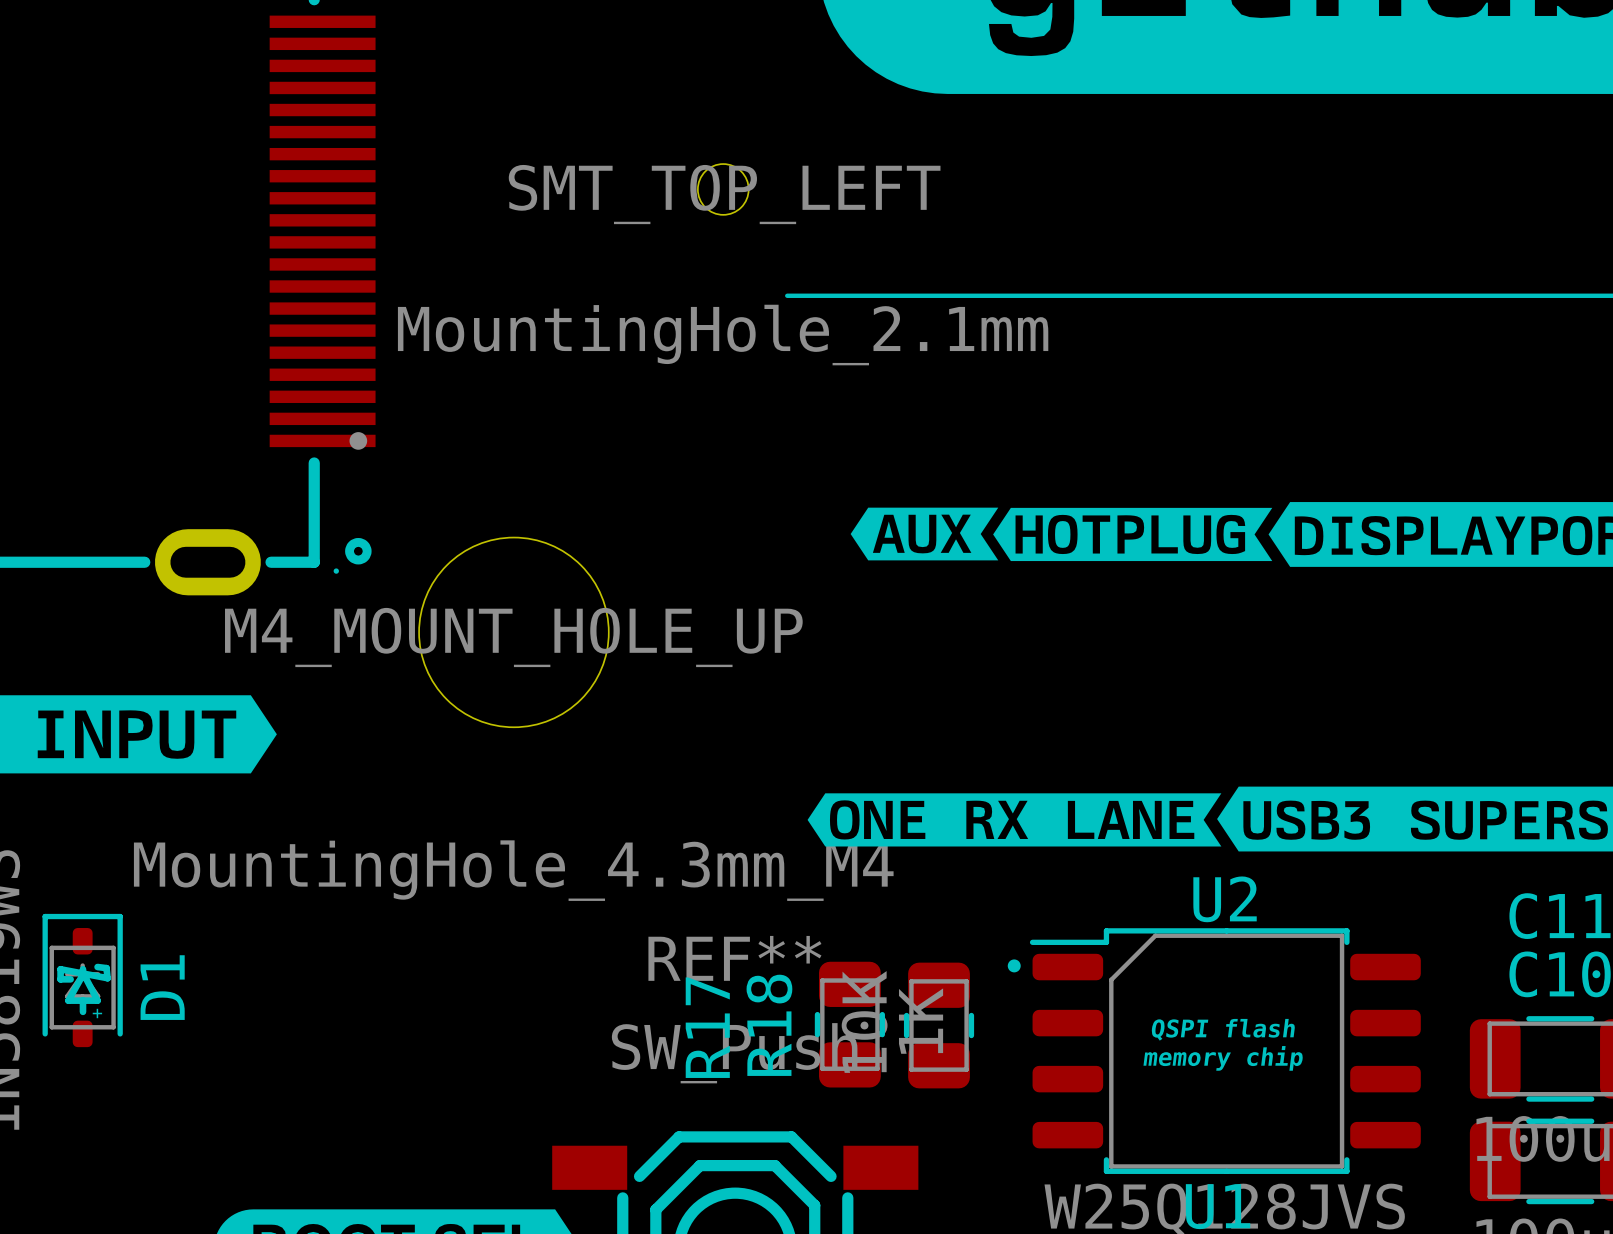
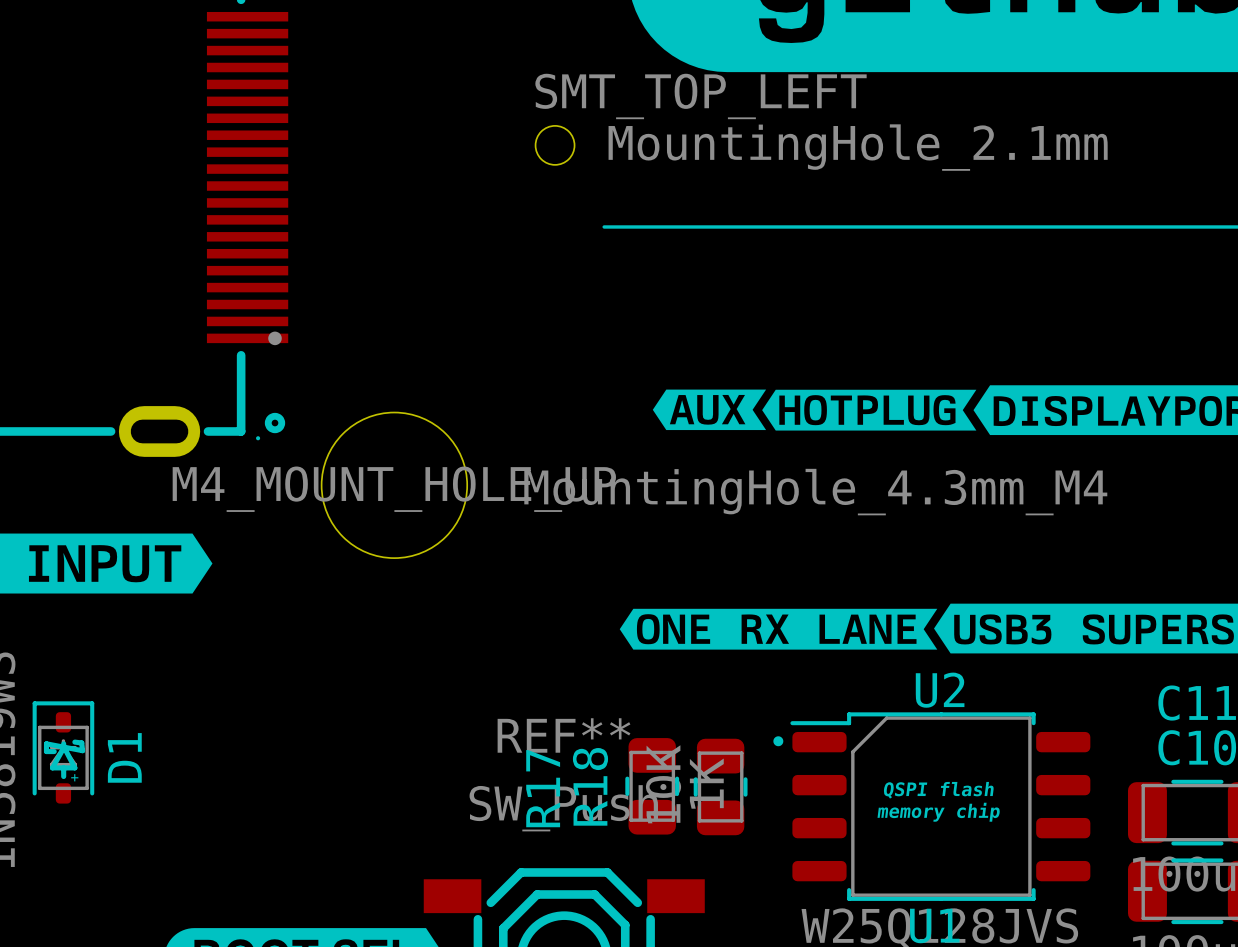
SMT_TOP_LEFT name position: SMT_TOP_LEFT (724, 194) -> SMT_TOP_LEFT (701, 96)
SMT_TOP_LEFT value position: MountingHole_2.1mm (723, 335) -> MountingHole_2.1mm (858, 147)
M4_MOUNT_HOLE_UP value position: MountingHole_4.3mm_M4 (513, 870) -> MountingHole_4.3mm_M4 (815, 492)

